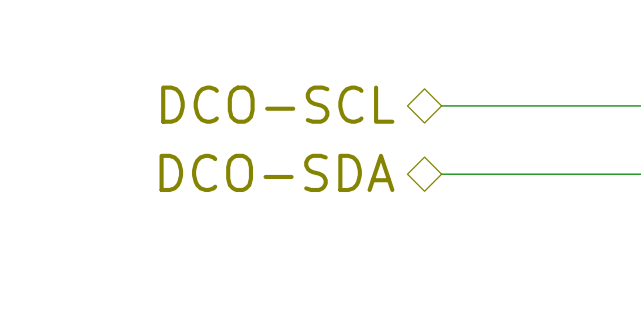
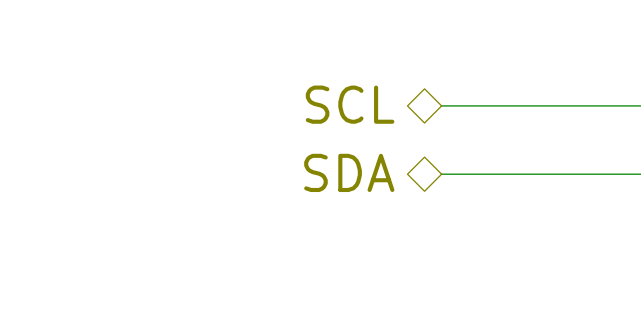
hierarchical label: DCO-SCL (277, 104) -> SCL (350, 104)
hierarchical label: DCO-SDA (276, 172) -> SDA (349, 172)

